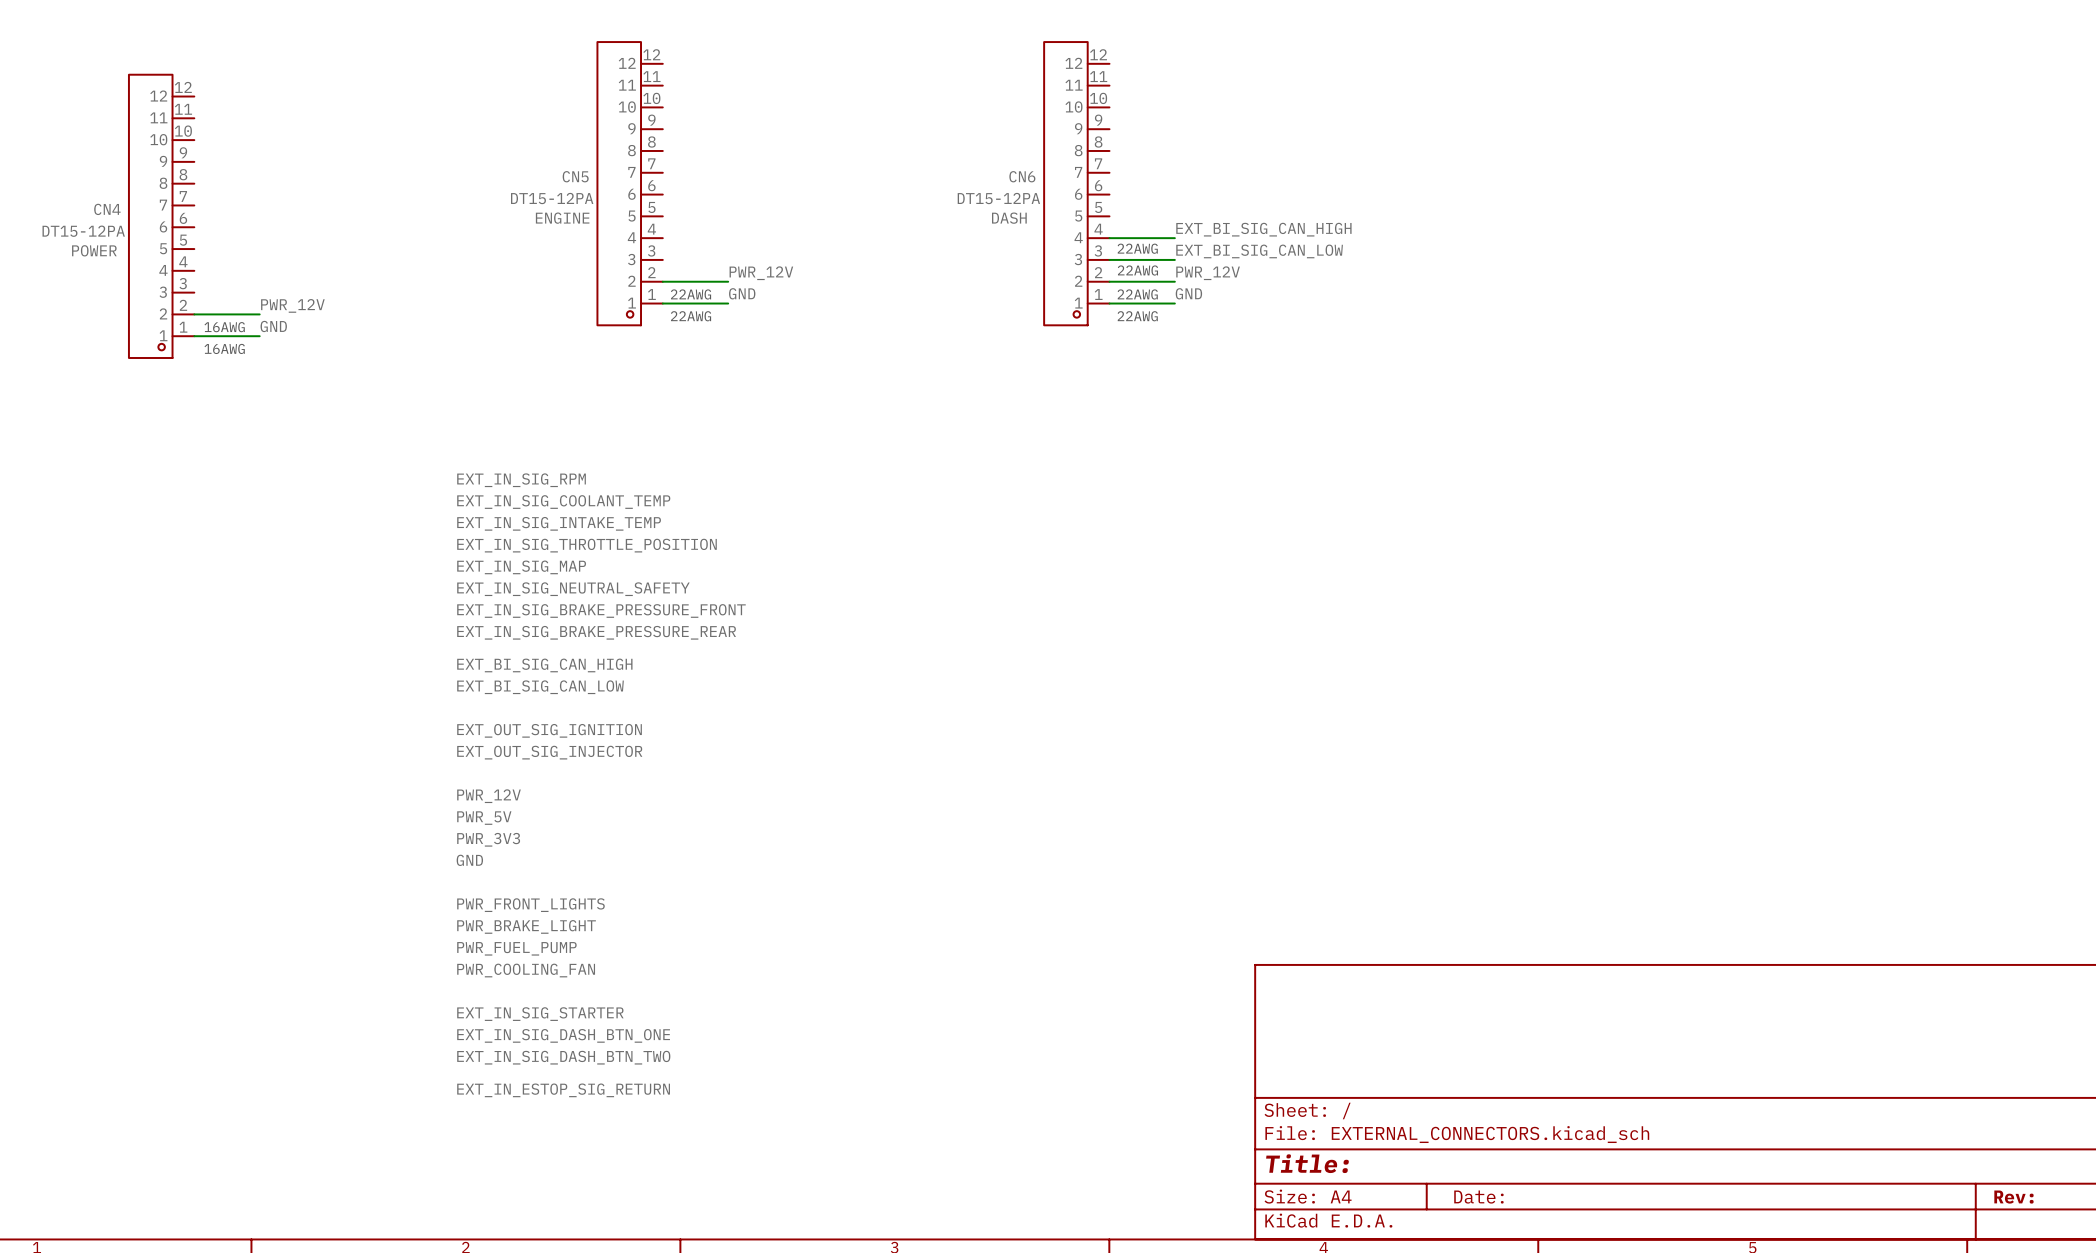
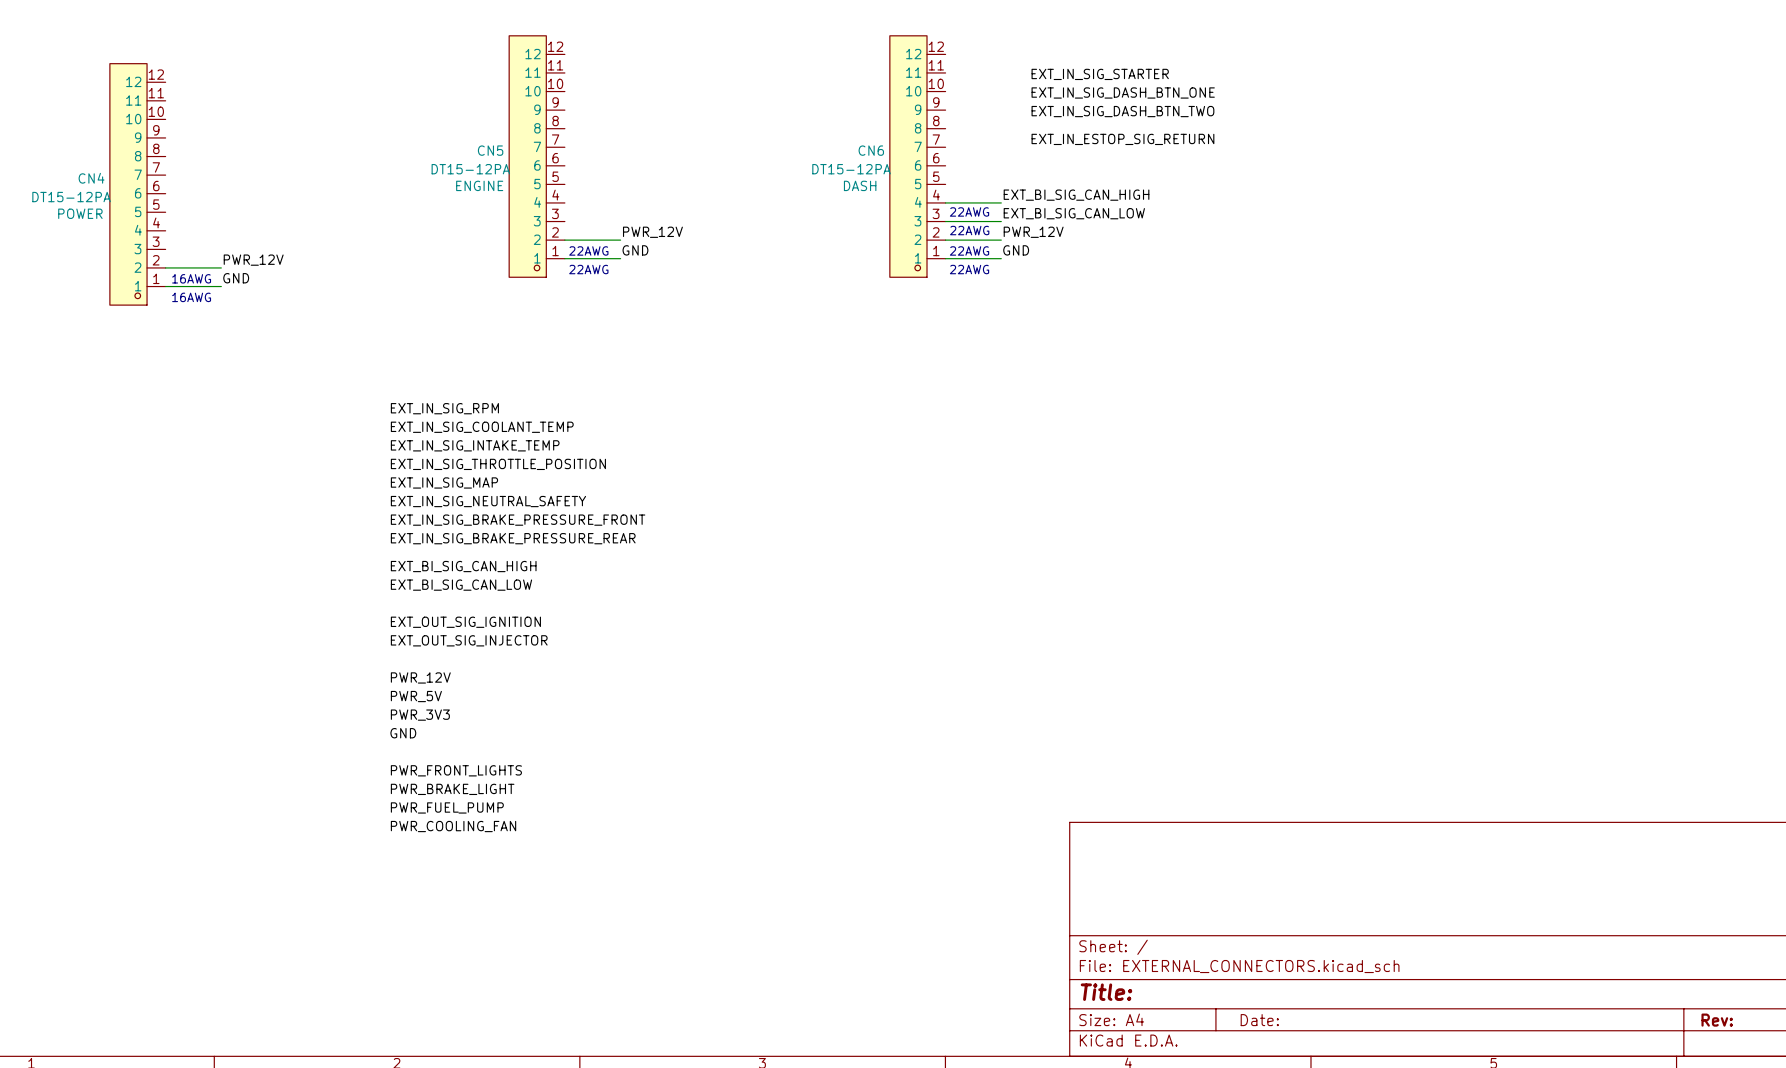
label: none -> EXT_IN_SIG_STARTER (1100, 74)
label: none -> EXT_IN_SIG_DASH_BTN_ONE (1123, 92)
label: none -> EXT_IN_SIG_DASH_BTN_TWO (1122, 111)
label: none -> EXT_IN_ESTOP_SIG_RETURN (1122, 139)
label: EXT_IN_SIG_STARTER (540, 1014) -> none
label: EXT_IN_SIG_DASH_BTN_ONE (563, 1035) -> none
label: EXT_IN_SIG_DASH_BTN_TWO (563, 1057) -> none
label: EXT_IN_ESTOP_SIG_RETURN (563, 1090) -> none

